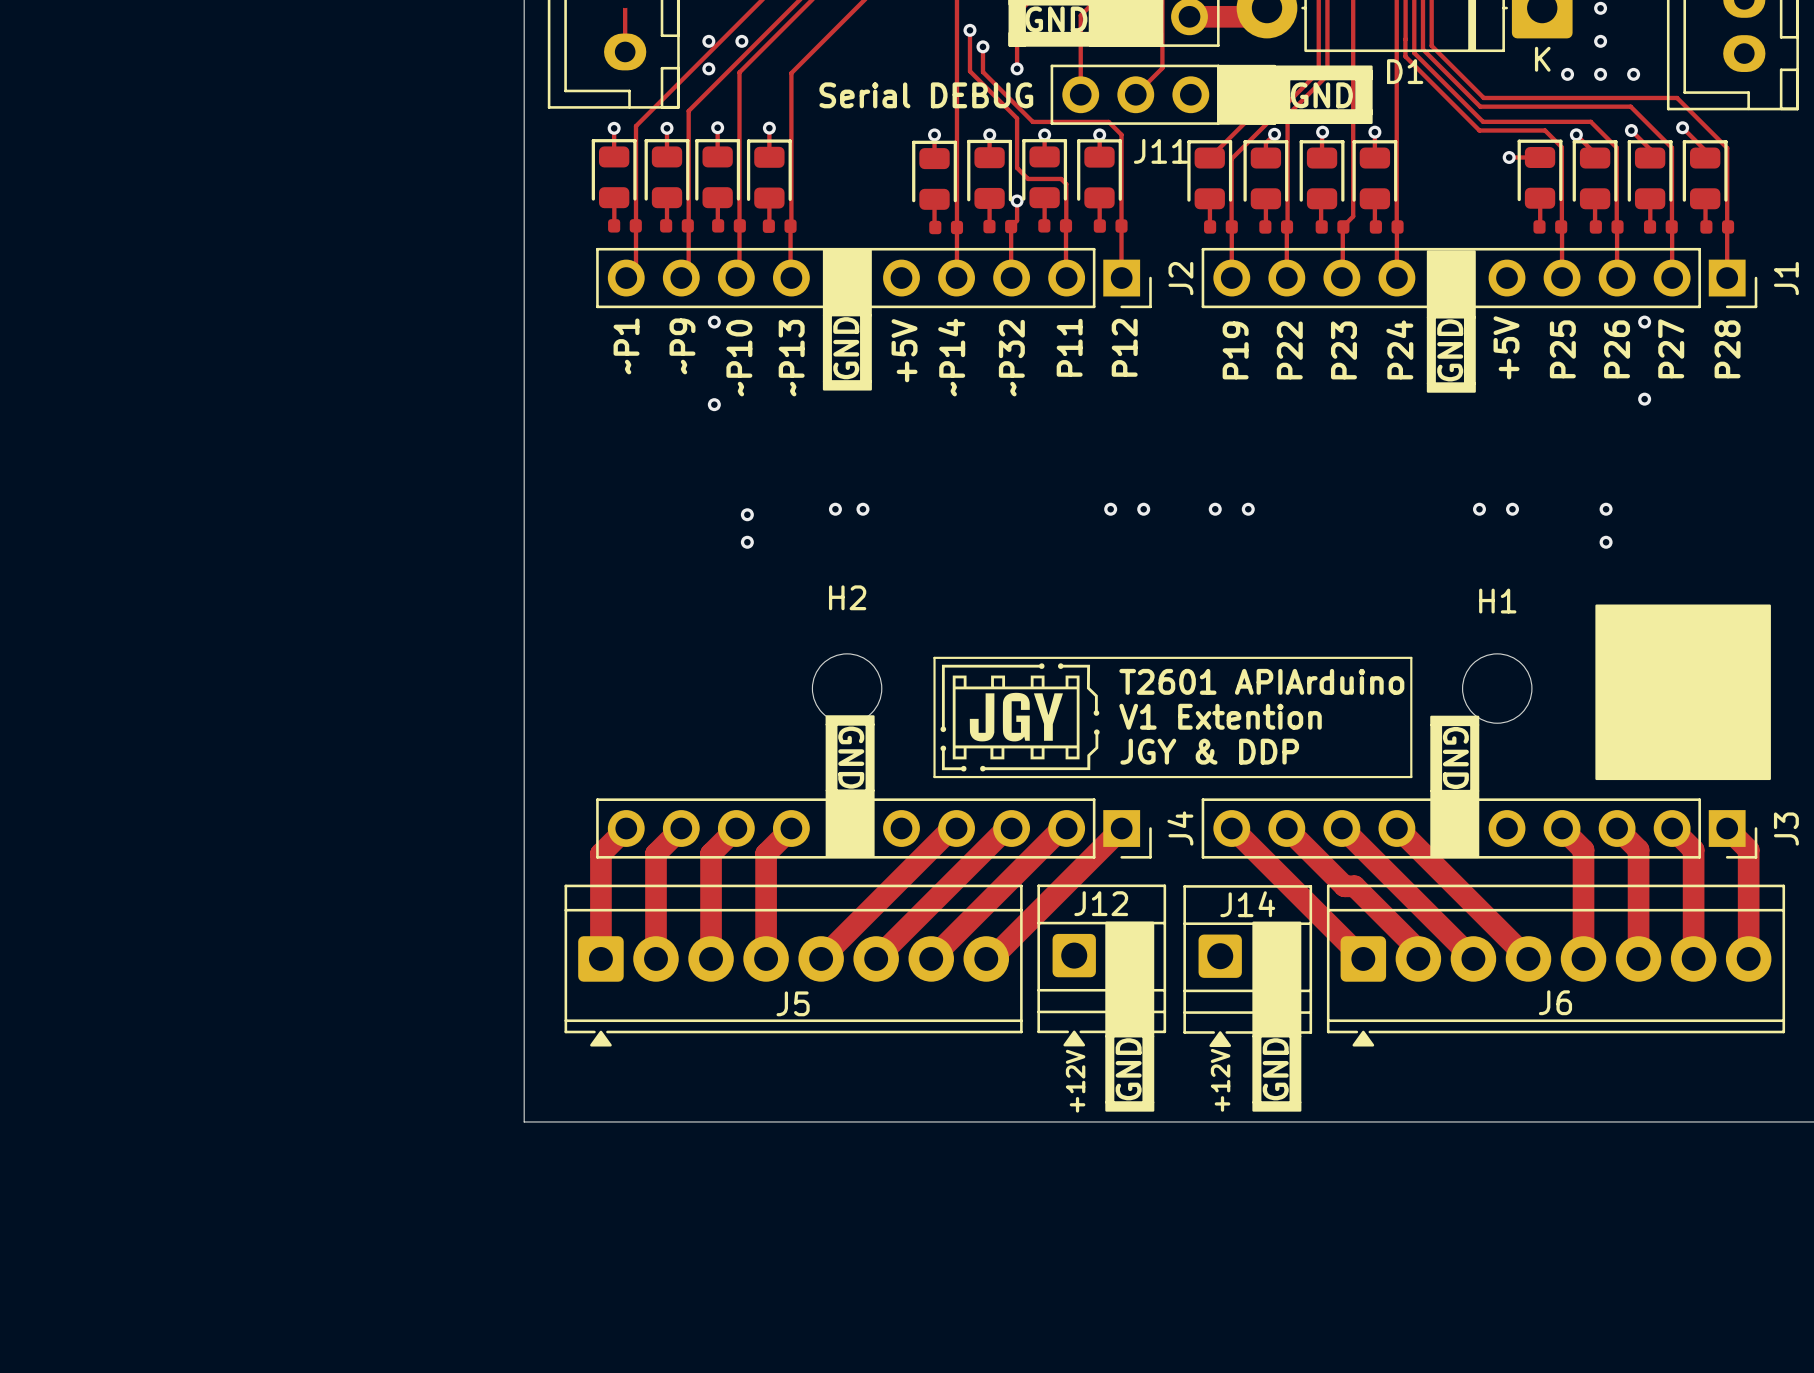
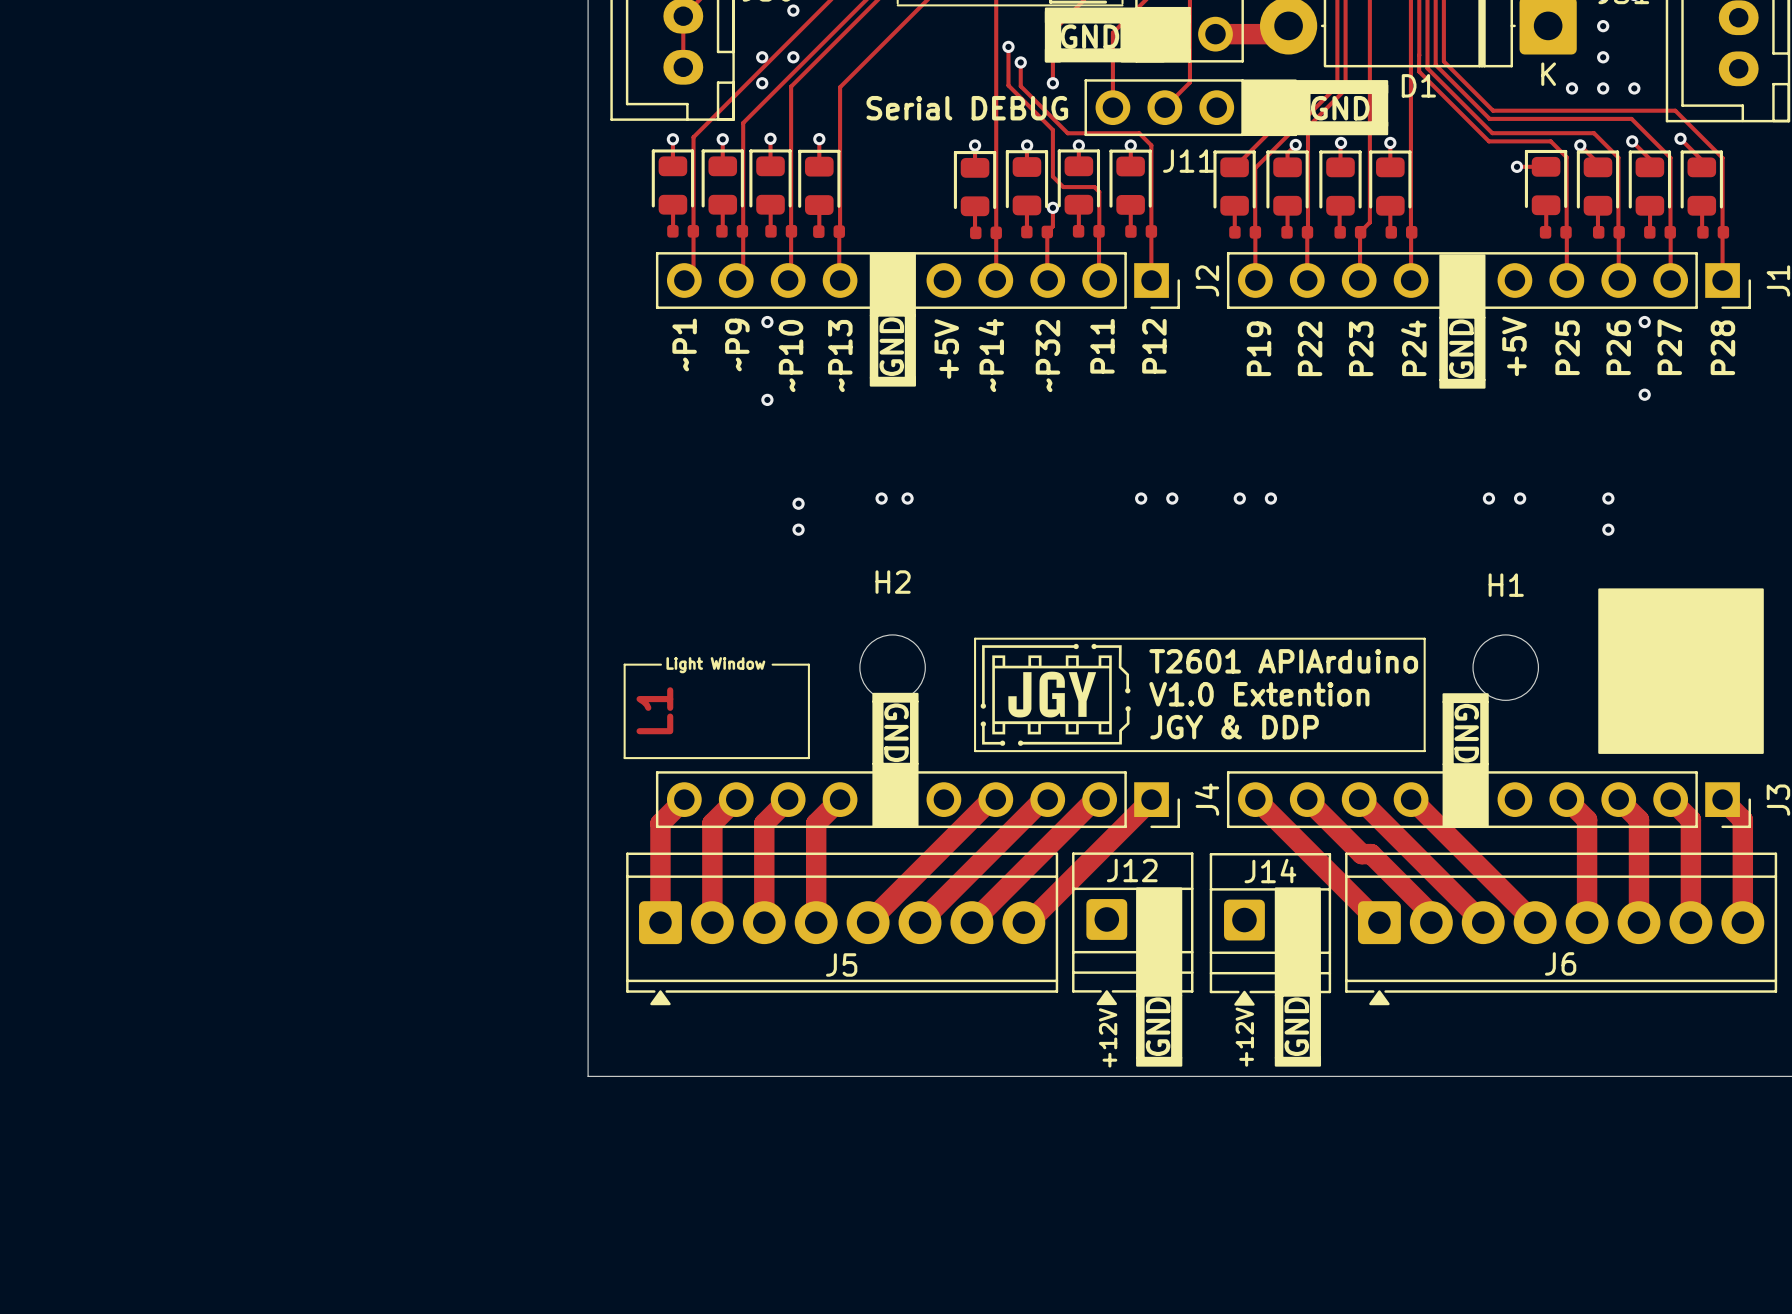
line: none -> (660, 664) (624, 664) (624, 758) (808, 758) (808, 664) (772, 664)
text: none -> Light Window (715, 665)
text: V1 Extention (1220, 716) -> V1.0 Extention (1259, 694)
text: none -> L1 (654, 710)

